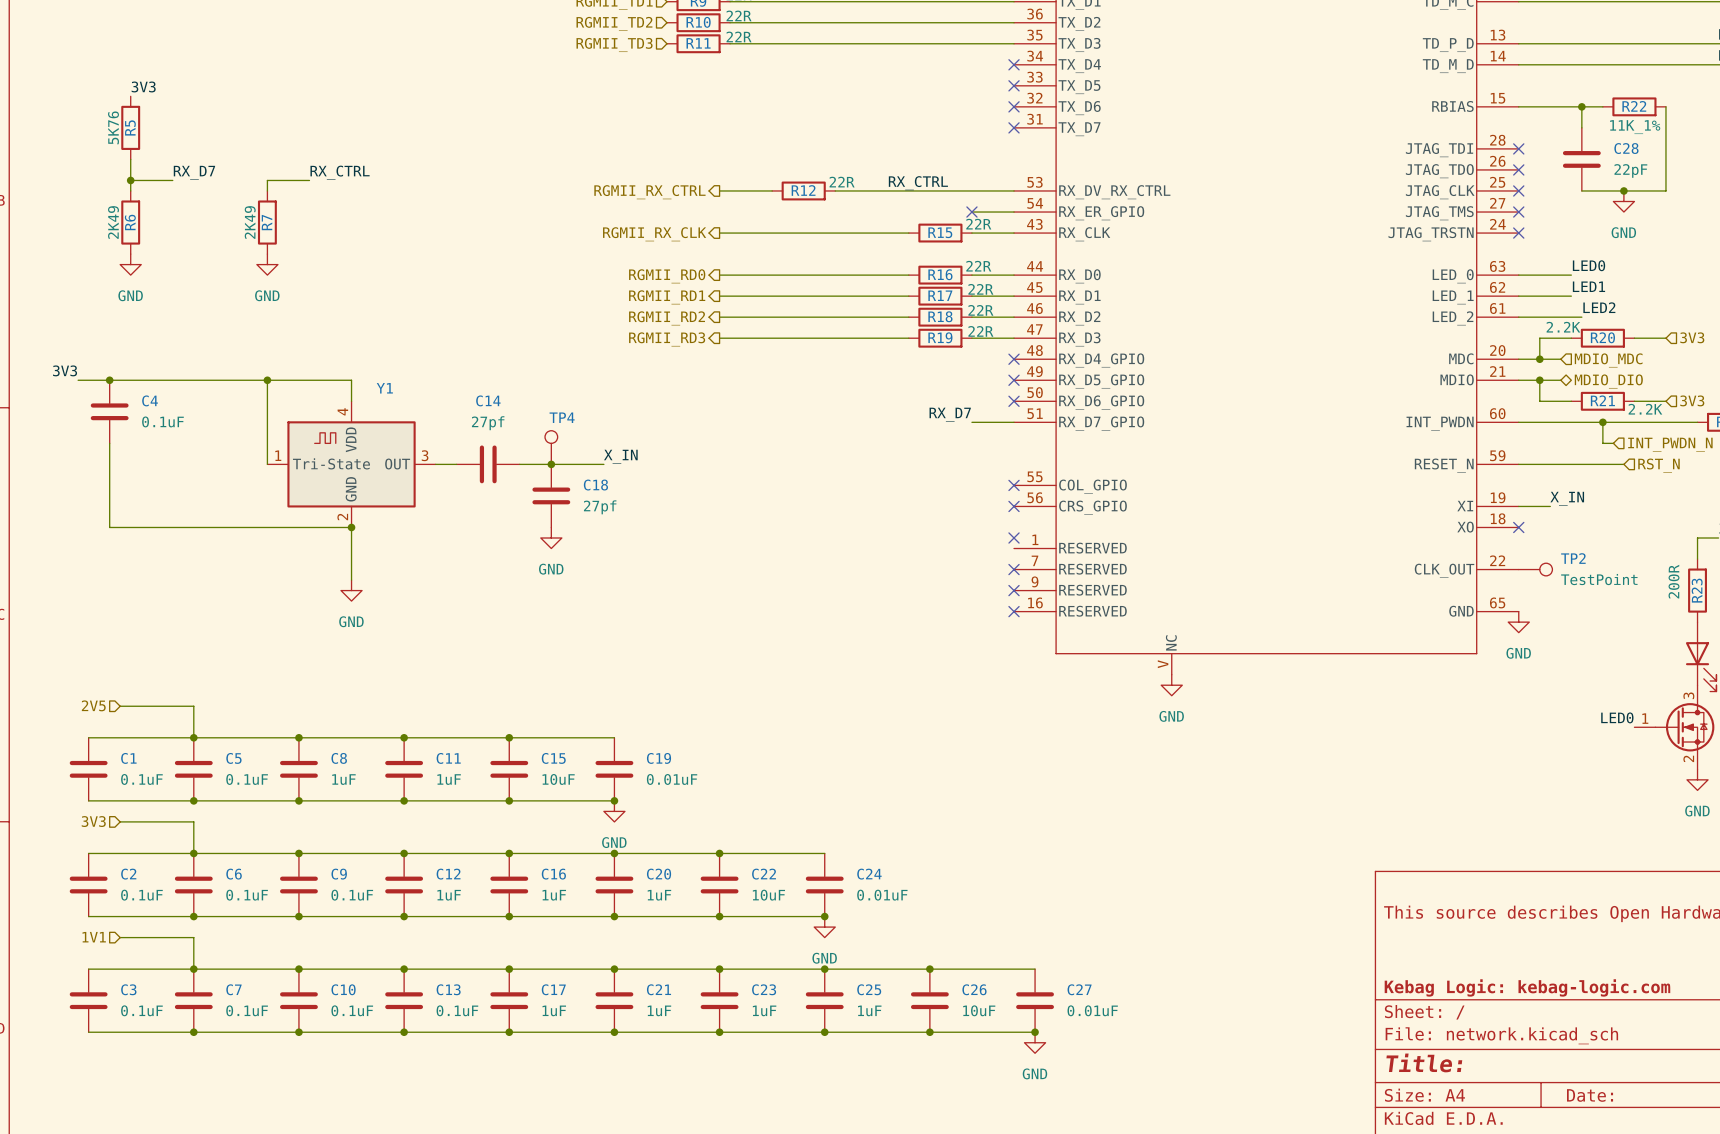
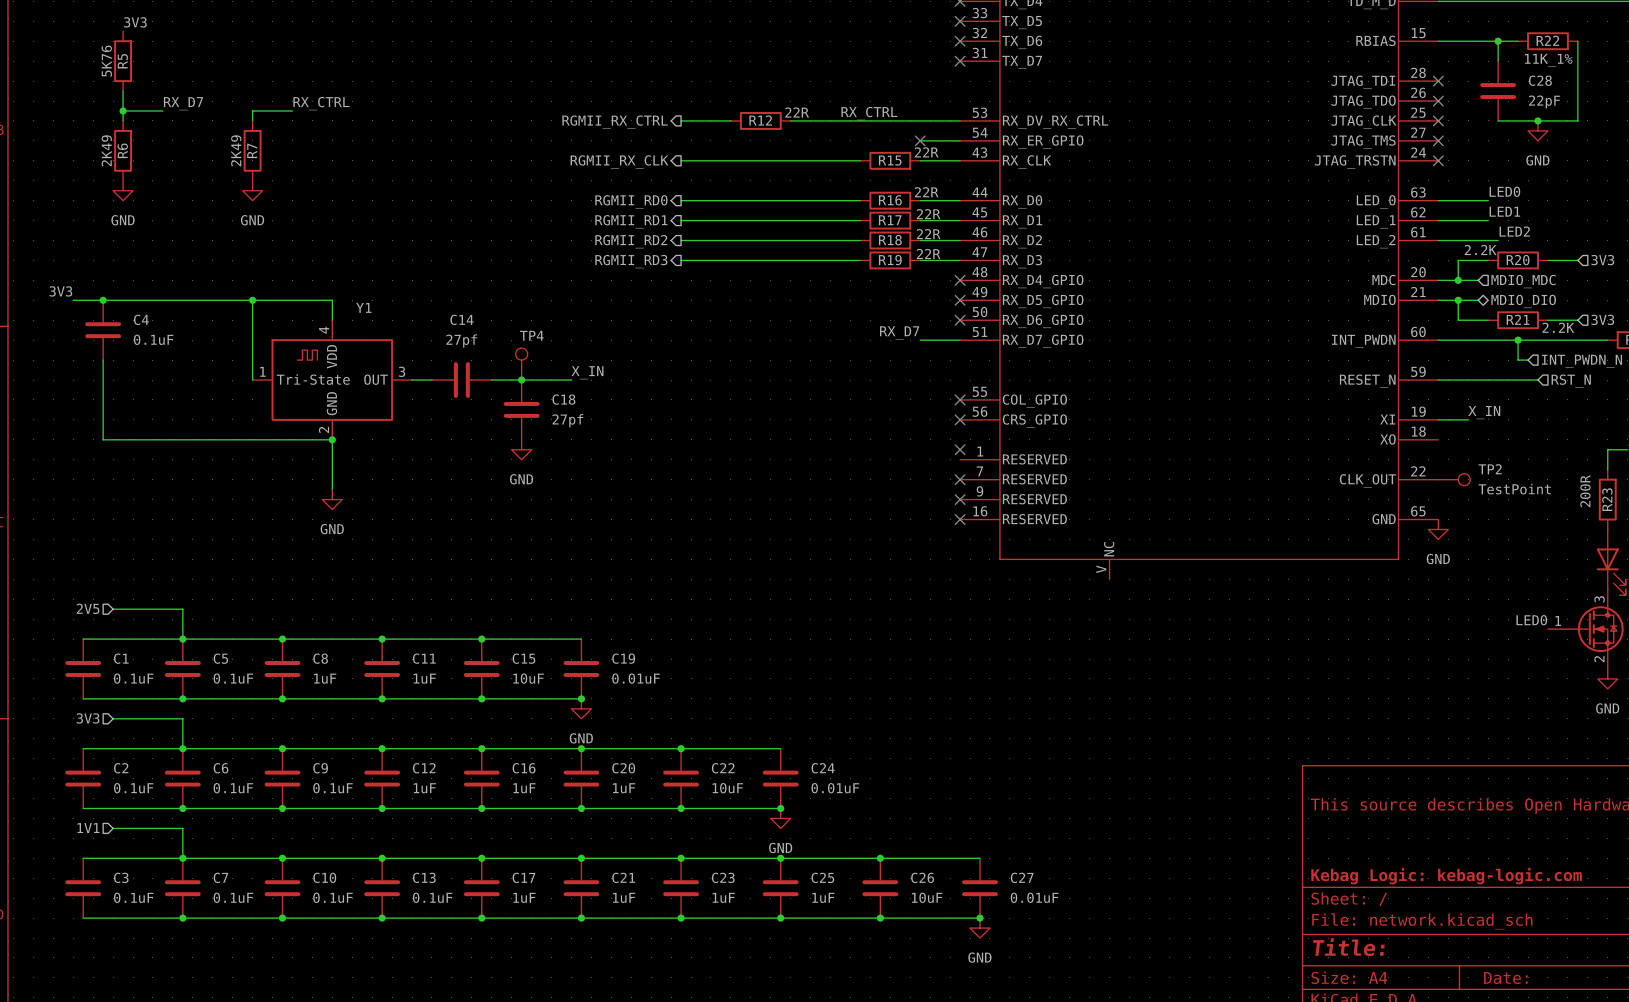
no-connect mark: (1518, 527) -> none
power symbol: GND (1171, 685) -> none

